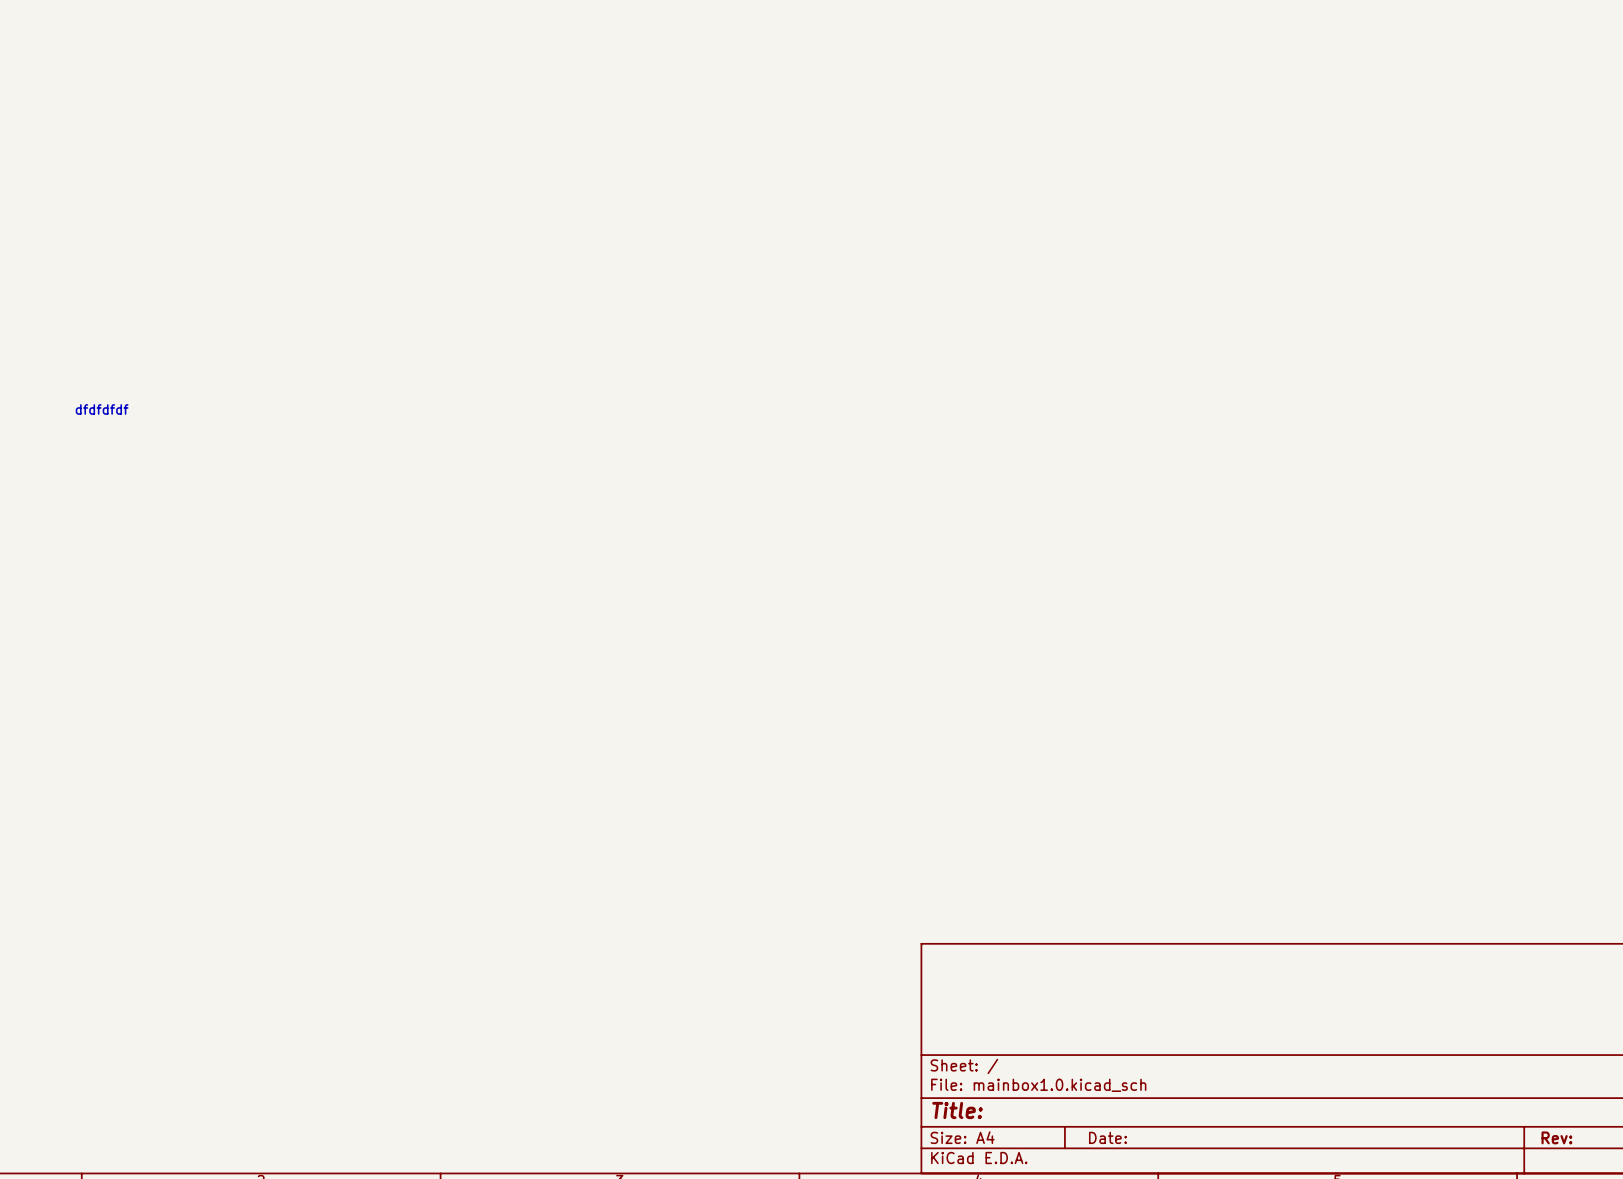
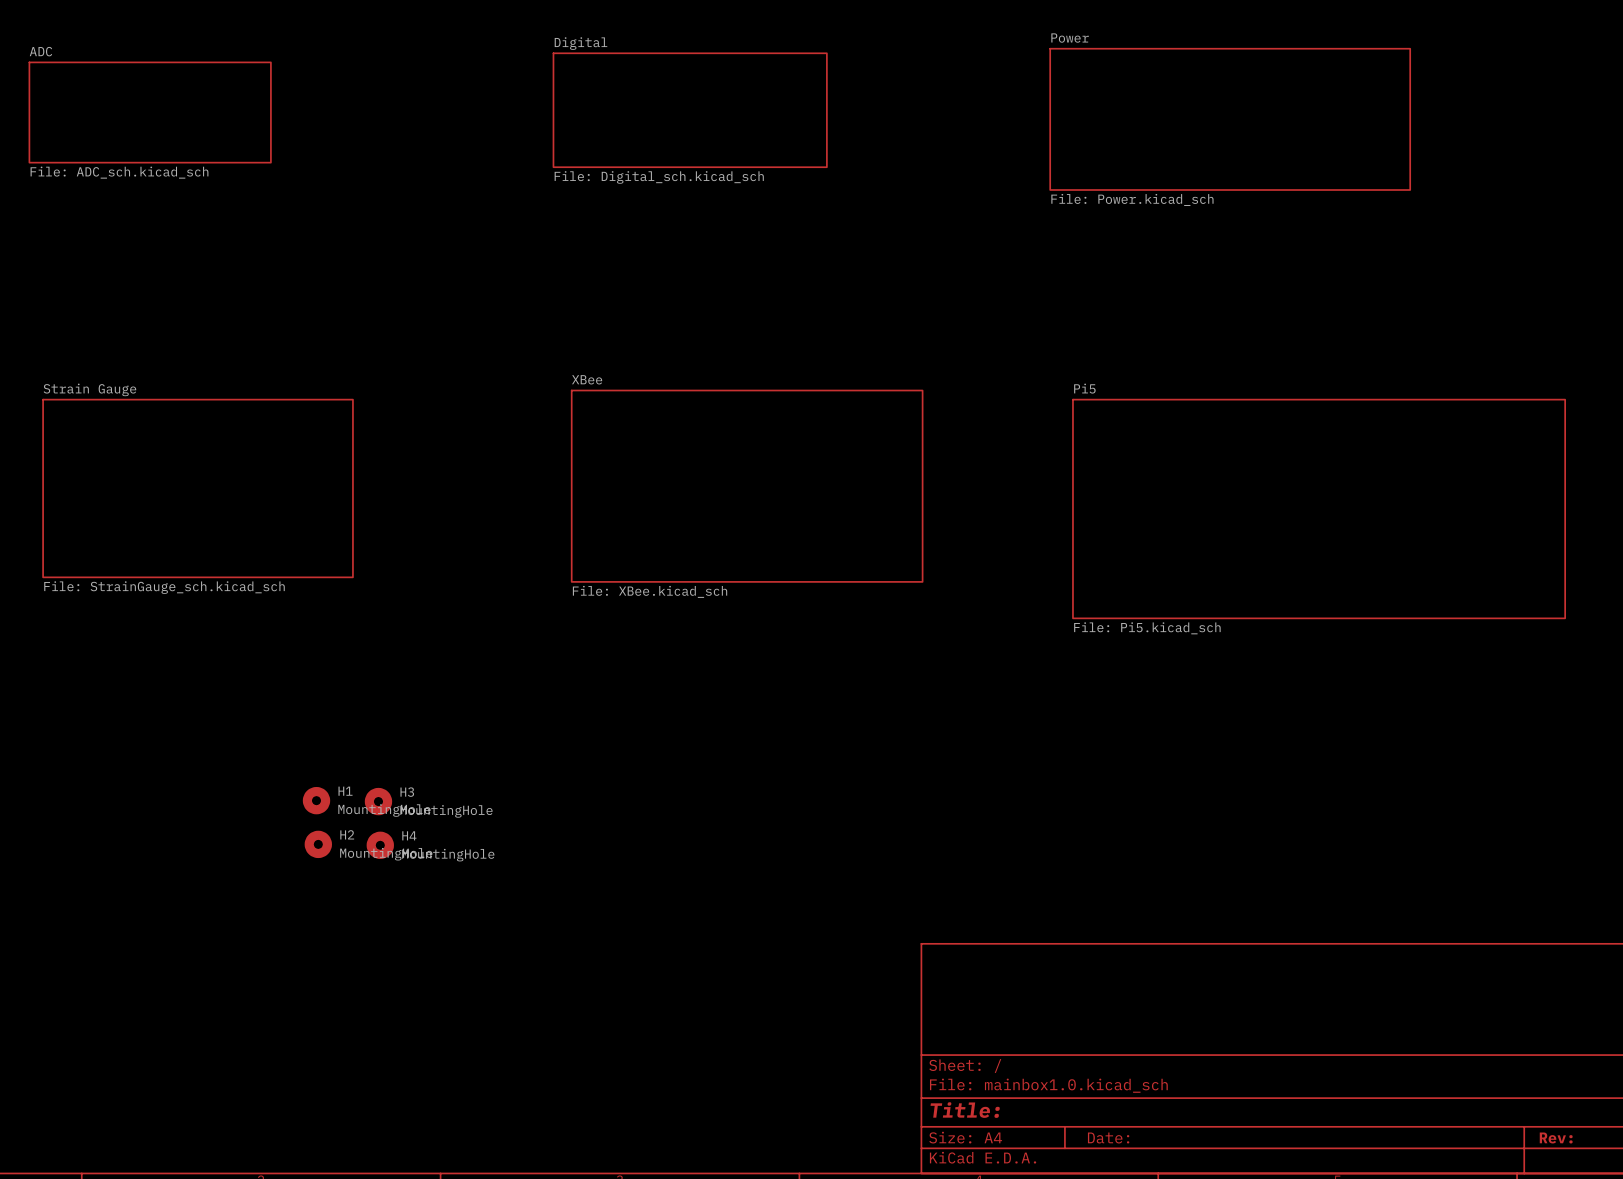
sheet Digital: none -> File: Digital_sch.kicad_sch (690, 110)
sheet ADC: none -> File: ADC_sch.kicad_sch (150, 112)
sheet Power: none -> File: Power.kicad_sch (1230, 119)
text: dfdfdfdf (102, 409) -> none
sheet XBee: none -> File: XBee.kicad_sch (747, 486)
sheet Strain Gauge: none -> File: StrainGauge_sch.kicad_sch (198, 488)
sheet Pi5: none -> File: Pi5.kicad_sch (1319, 508)
H1: none -> MountingHole (316, 800)
H3: none -> MountingHole (378, 801)
H2: none -> MountingHole (318, 844)
H4: none -> MountingHole (380, 845)

